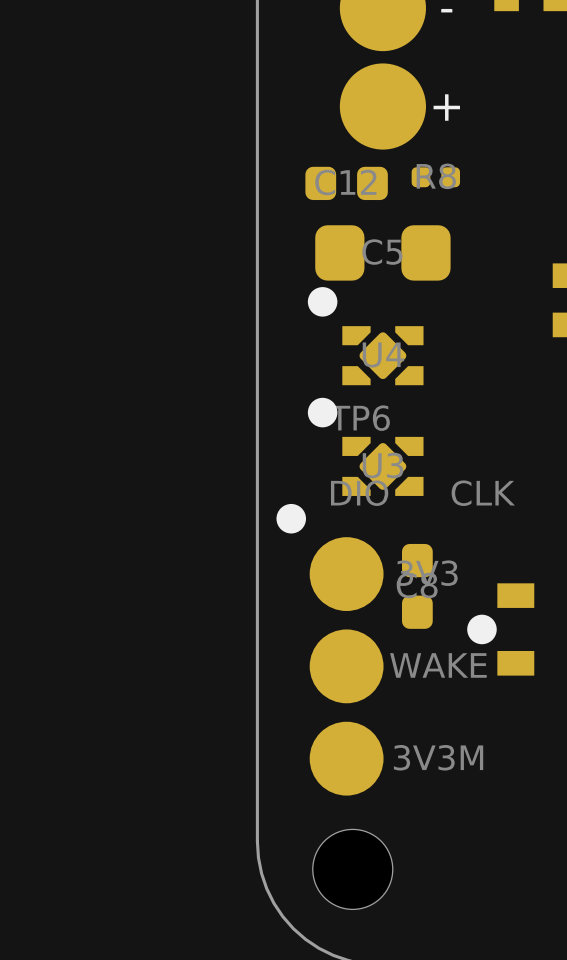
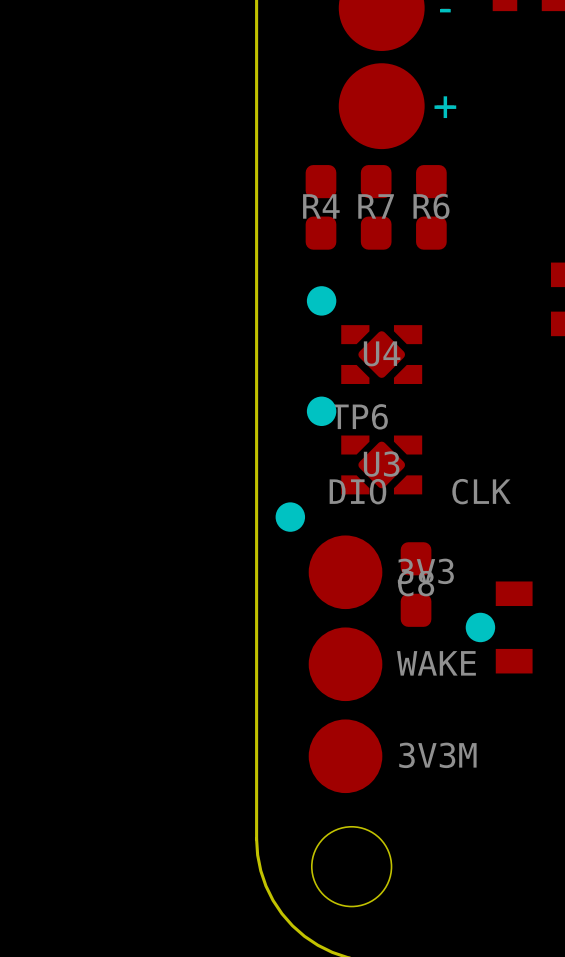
part footprint: [411, 167, 461, 188] -> [416, 165, 447, 250]
part: (346, 183) -> none
part: none -> (320, 207)
part: none -> (376, 207)
part: (382, 252) -> none

